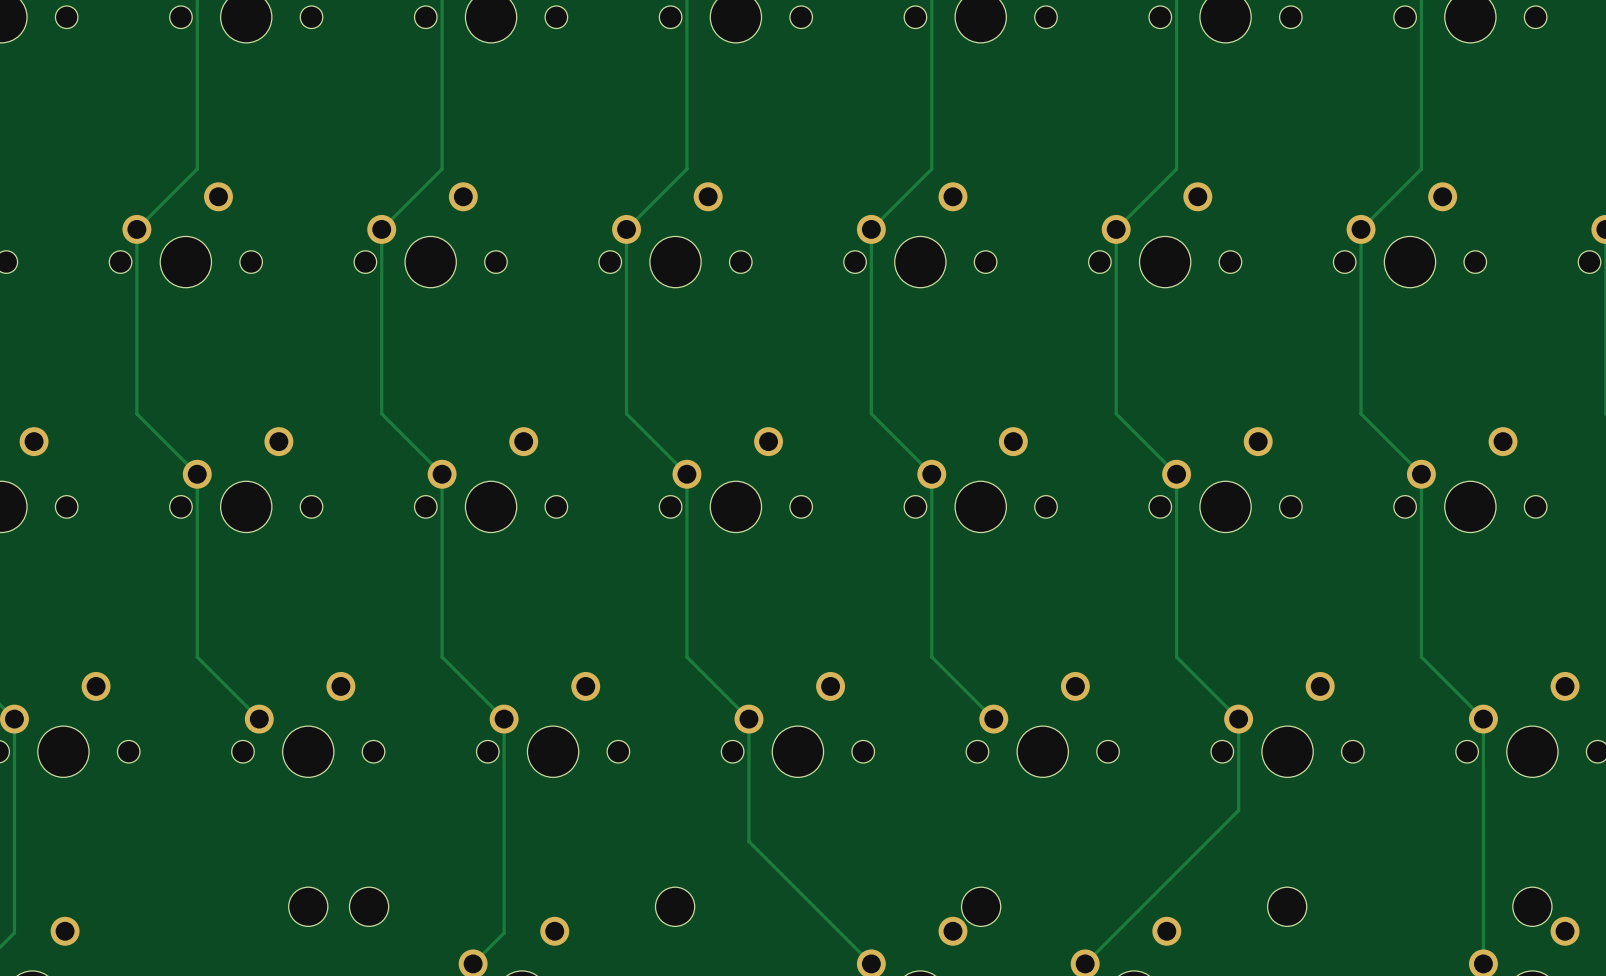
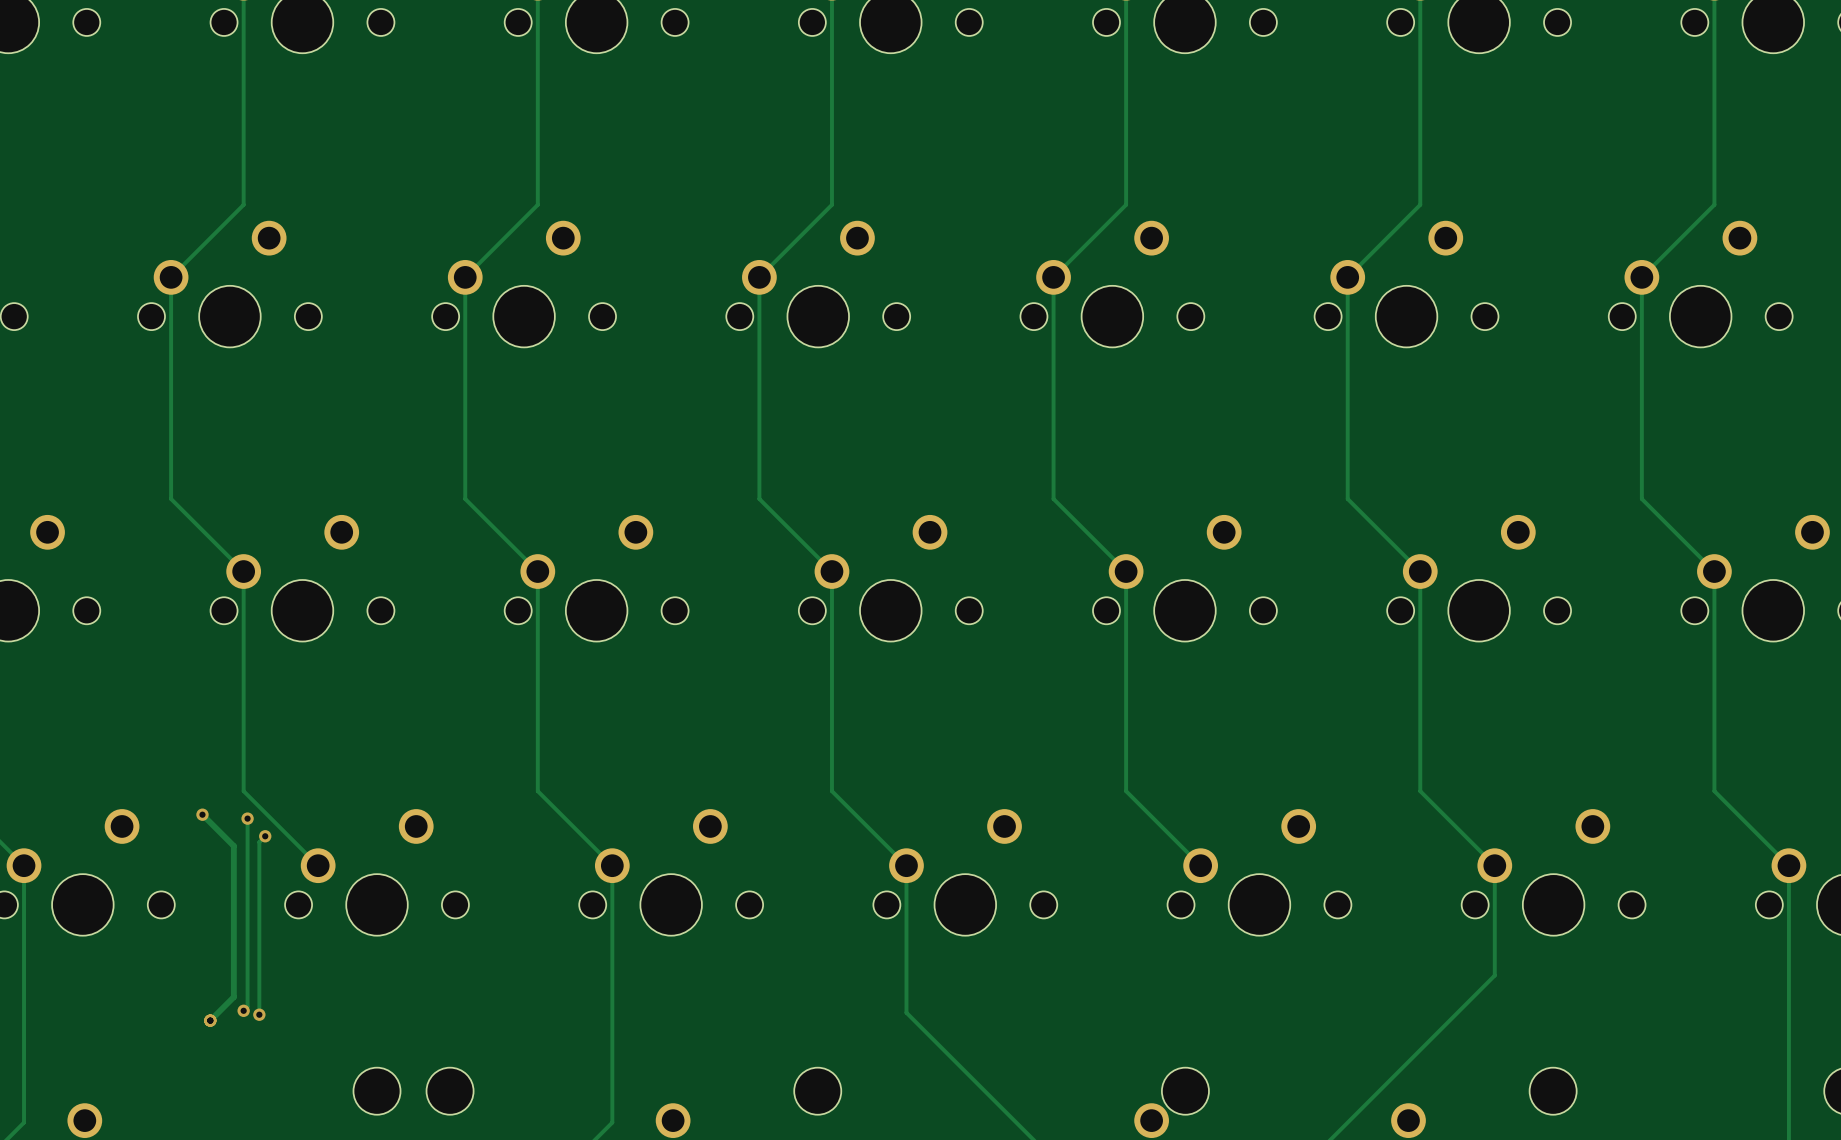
track: none -> (202, 814) (233, 846) (233, 997) (210, 1020)
via: none -> (202, 814)
track: none -> (247, 818) (247, 1006) (243, 1010)
via: none -> (247, 818)
track: none -> (265, 836) (259, 842) (259, 1014)
via: none -> (265, 836)
via: none -> (243, 1010)
via: none -> (259, 1014)
via: none -> (210, 1020)

